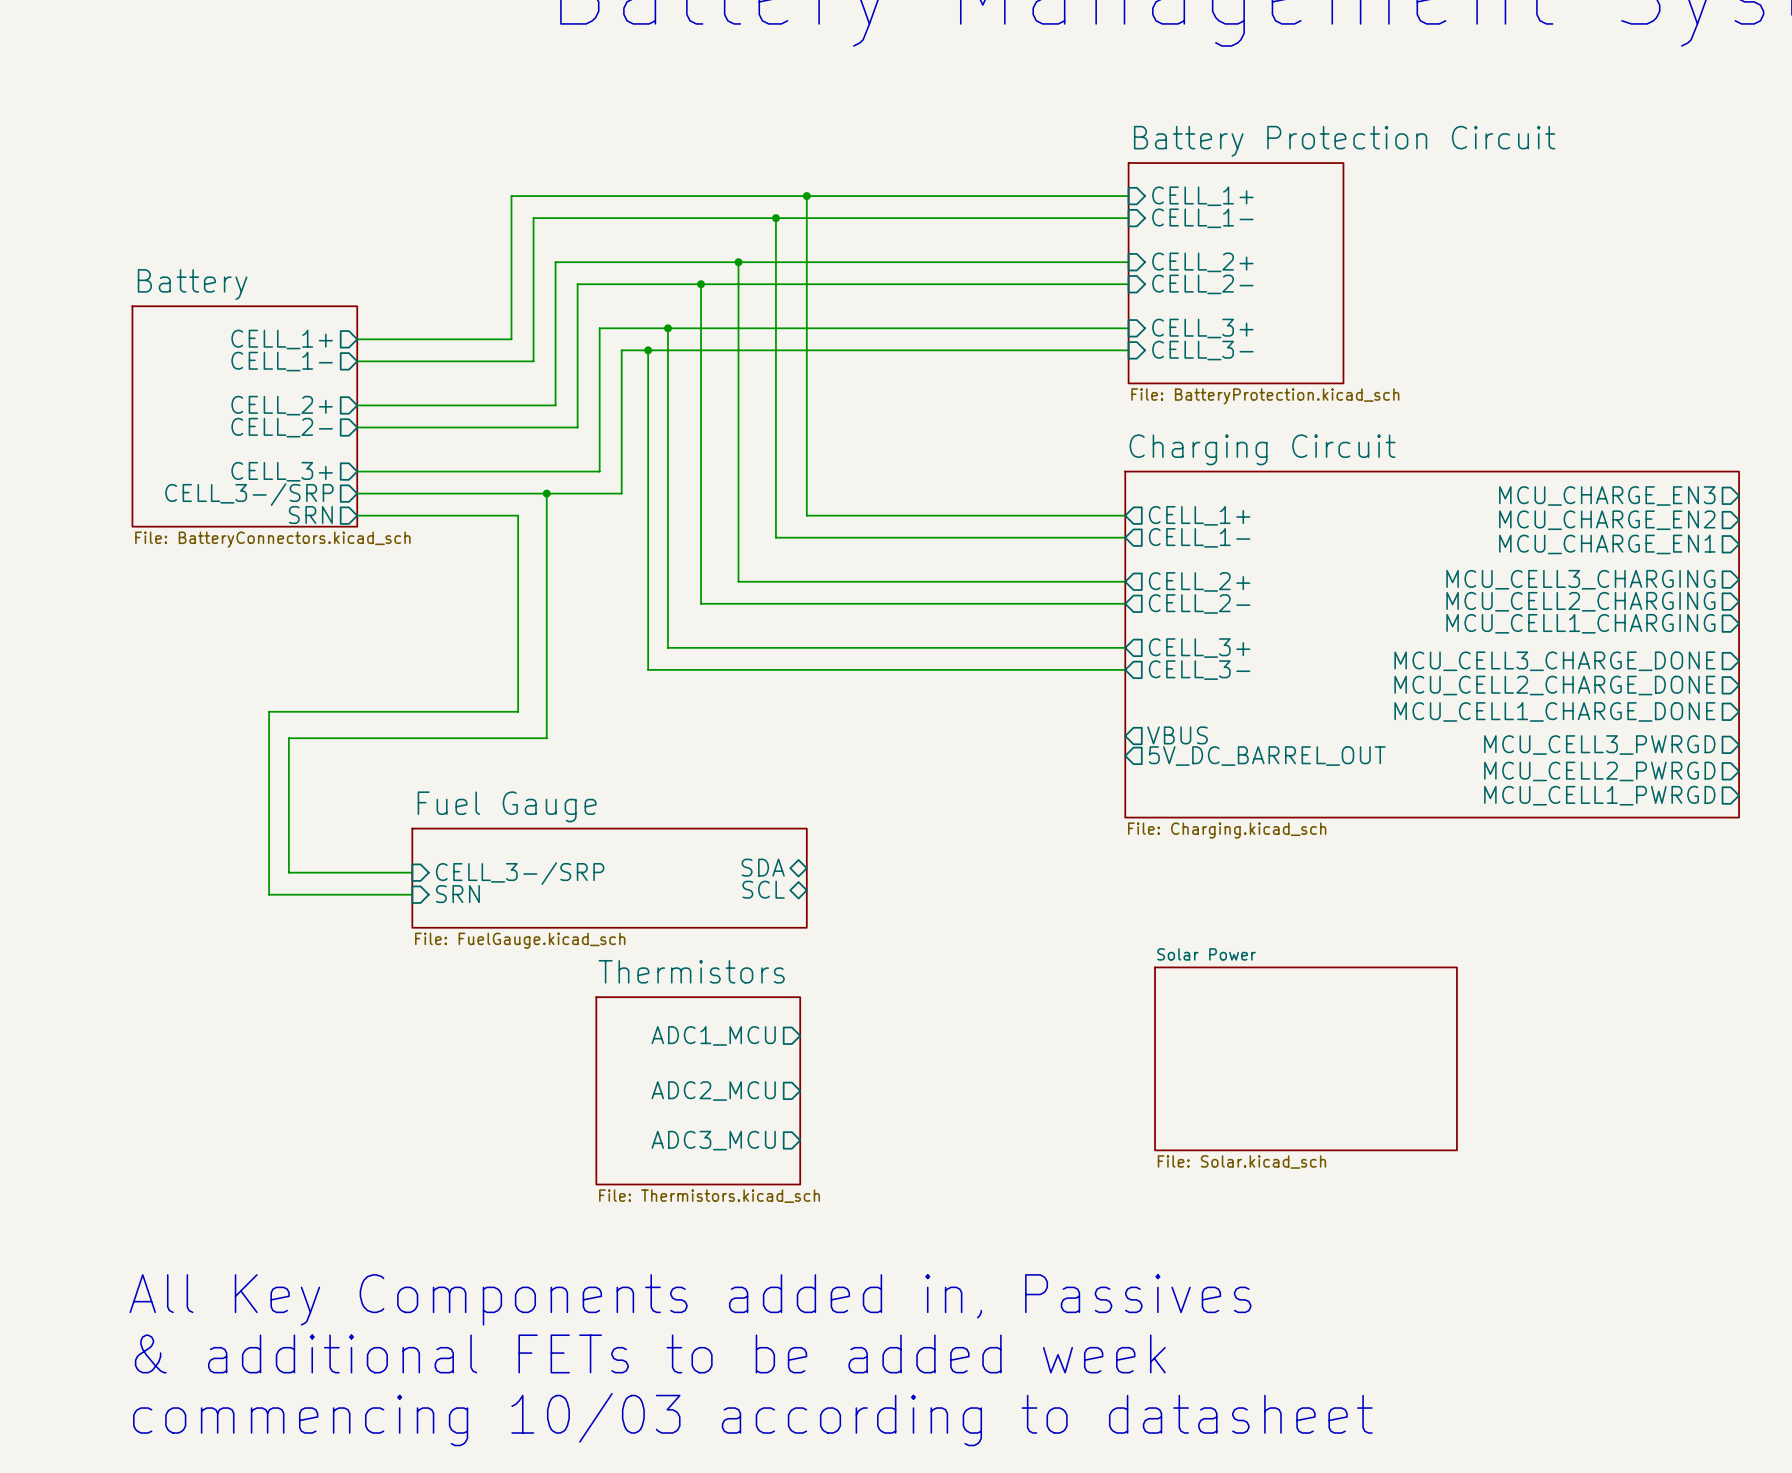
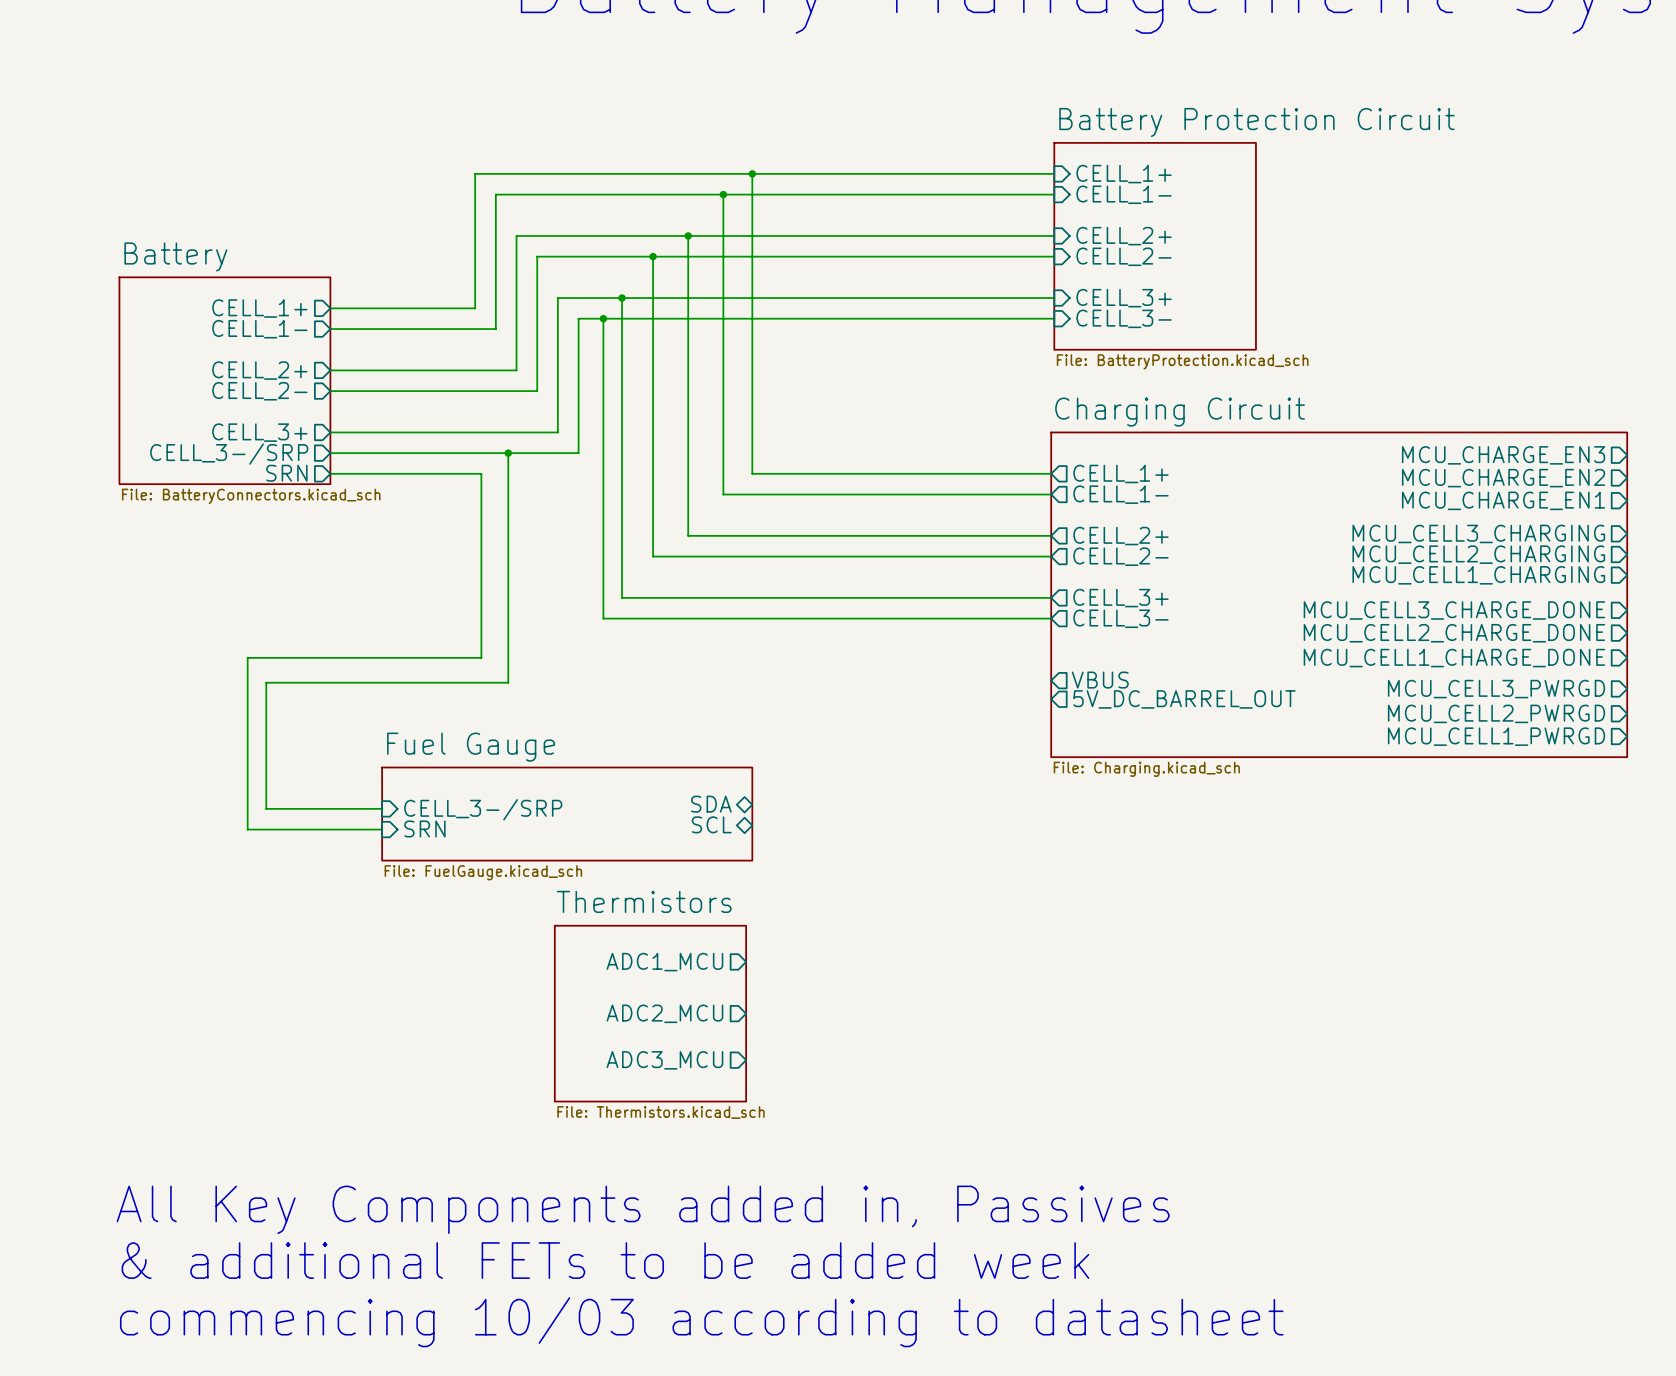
sheet Solar Power: File: Solar.kicad_sch (1305, 1058) -> none

